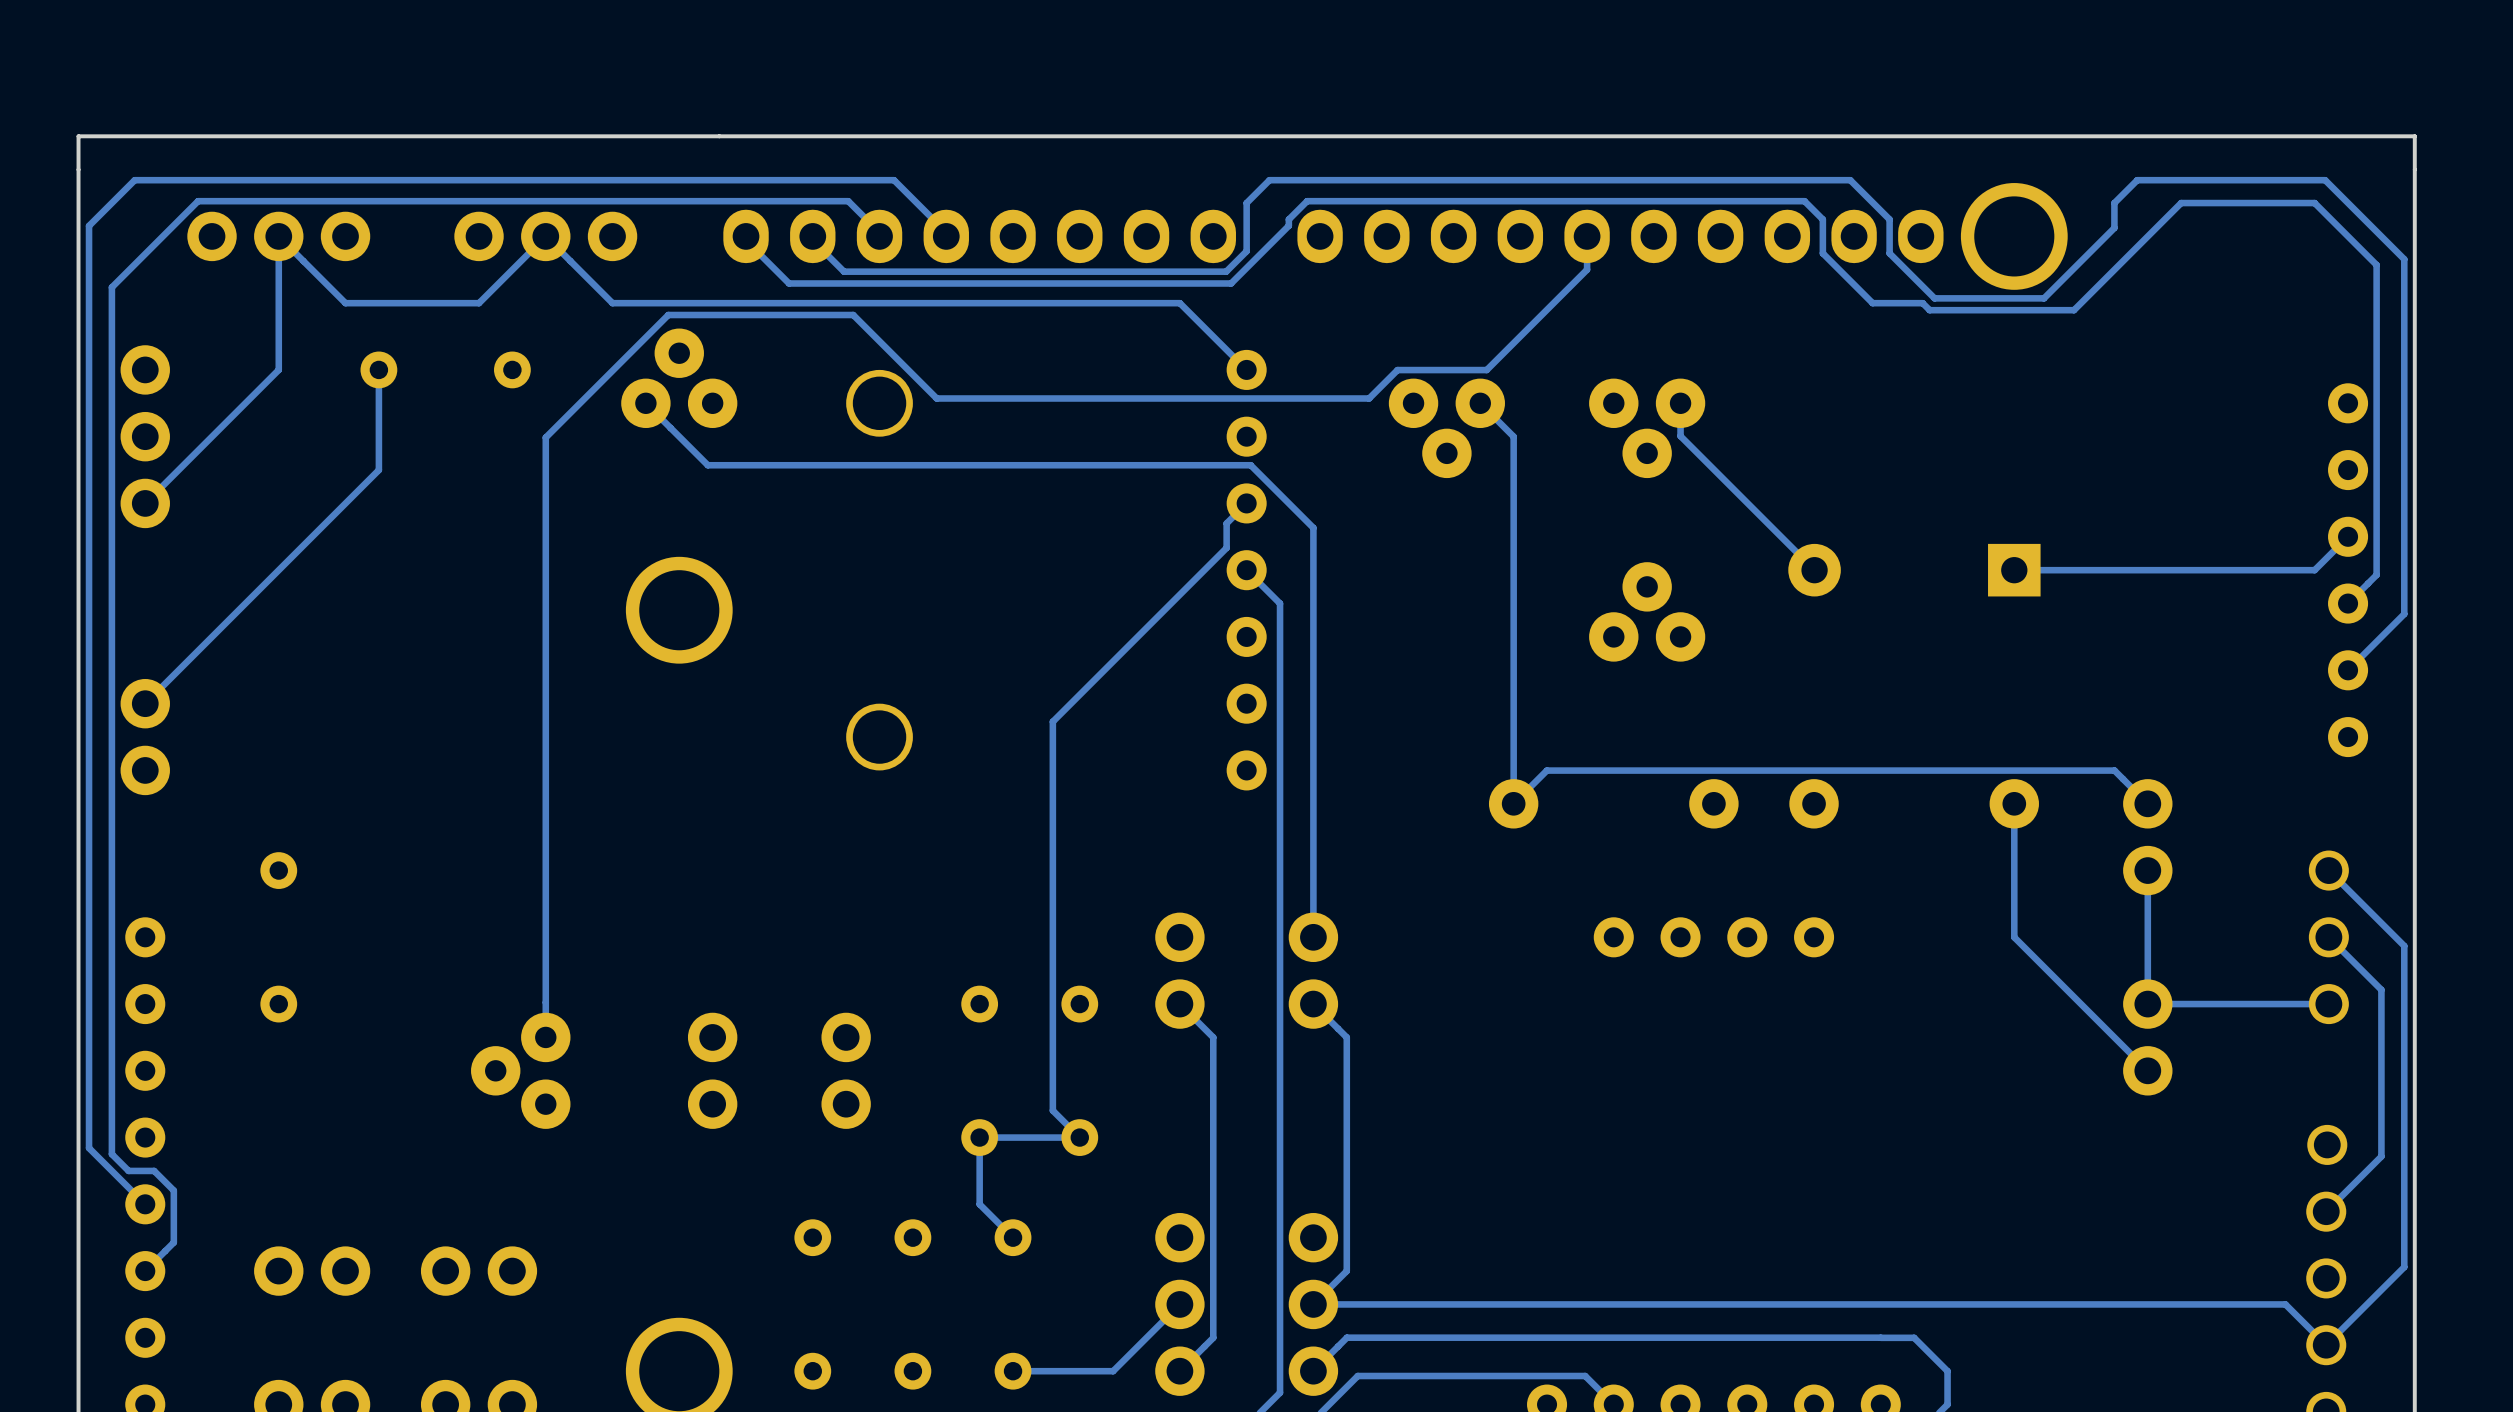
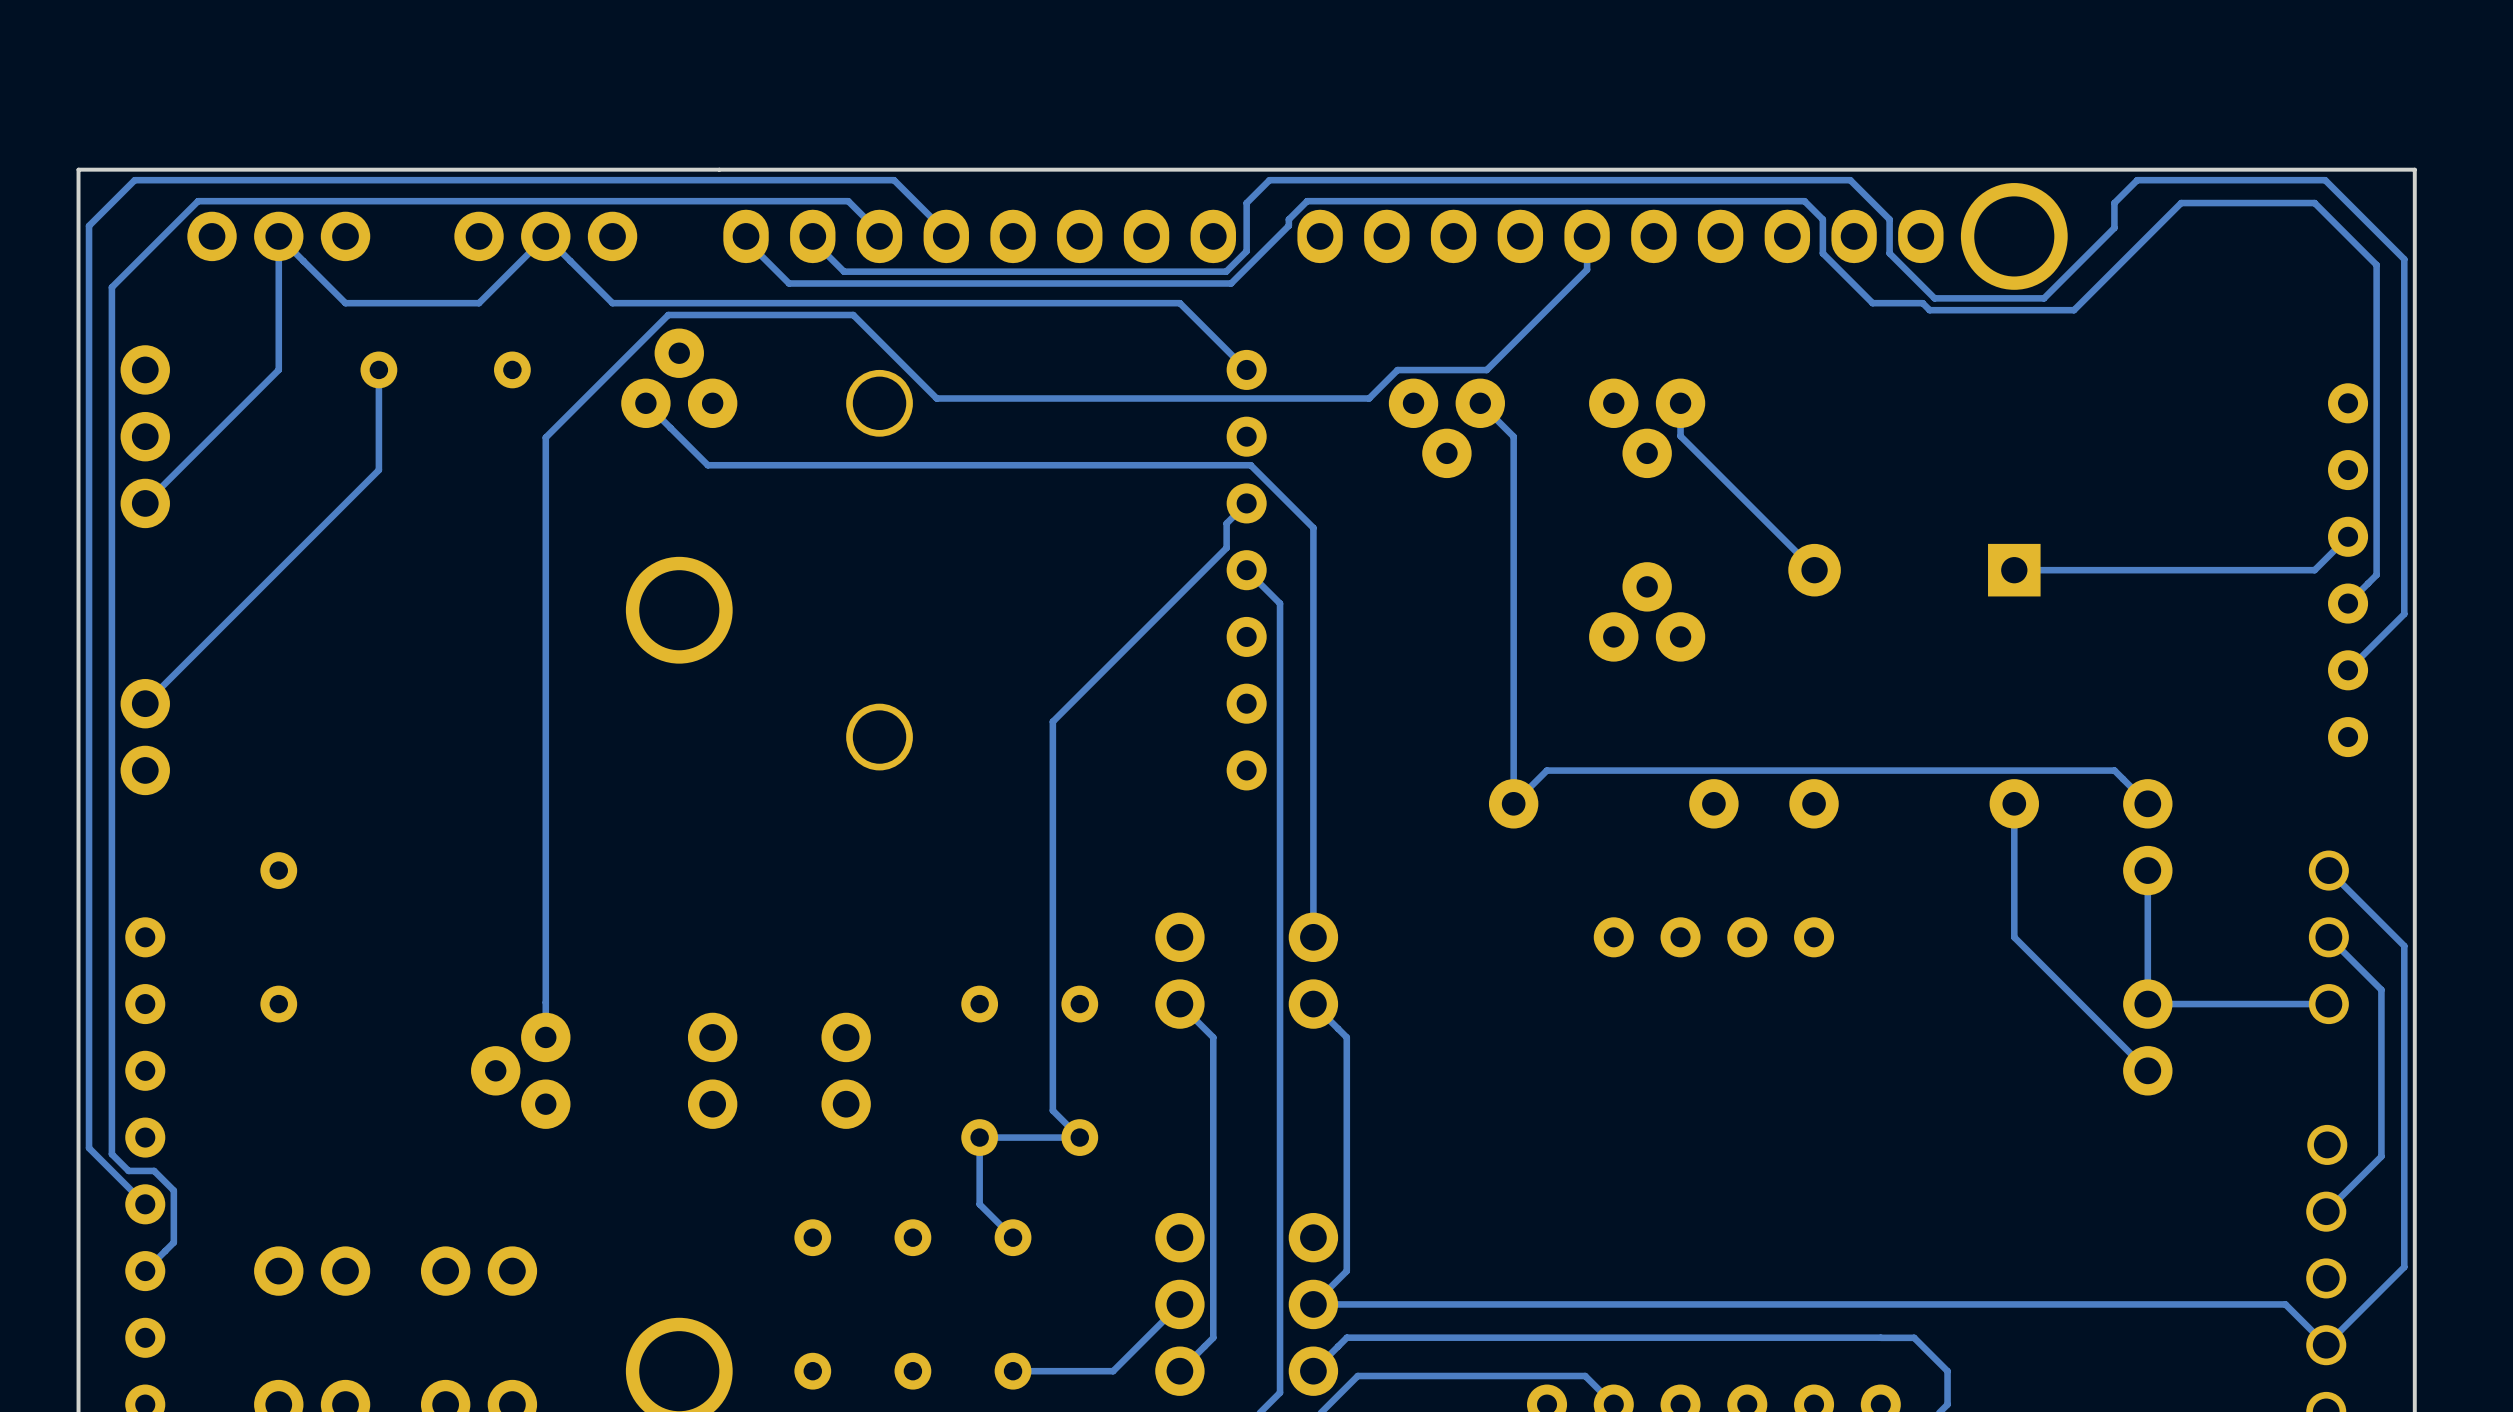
board edge: (2414, 169) (2414, 136) (78, 136) (78, 169) -> (2414, 169) (78, 169)

